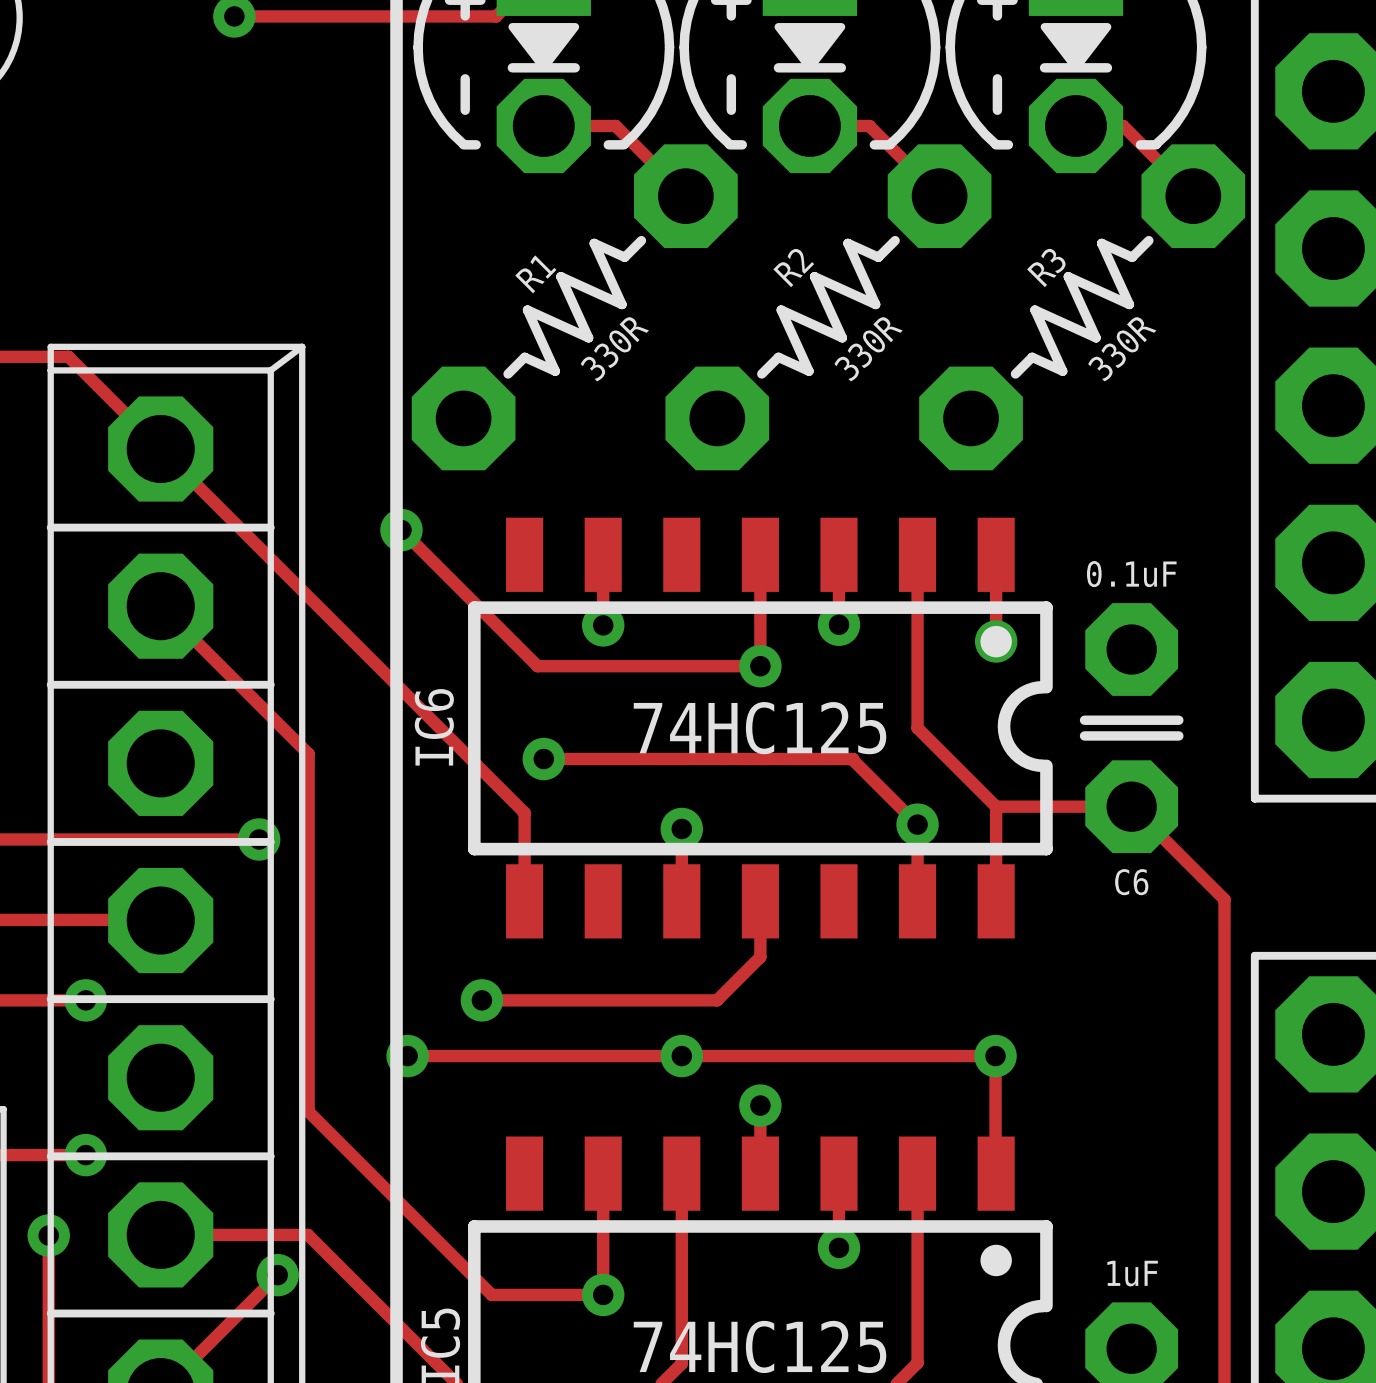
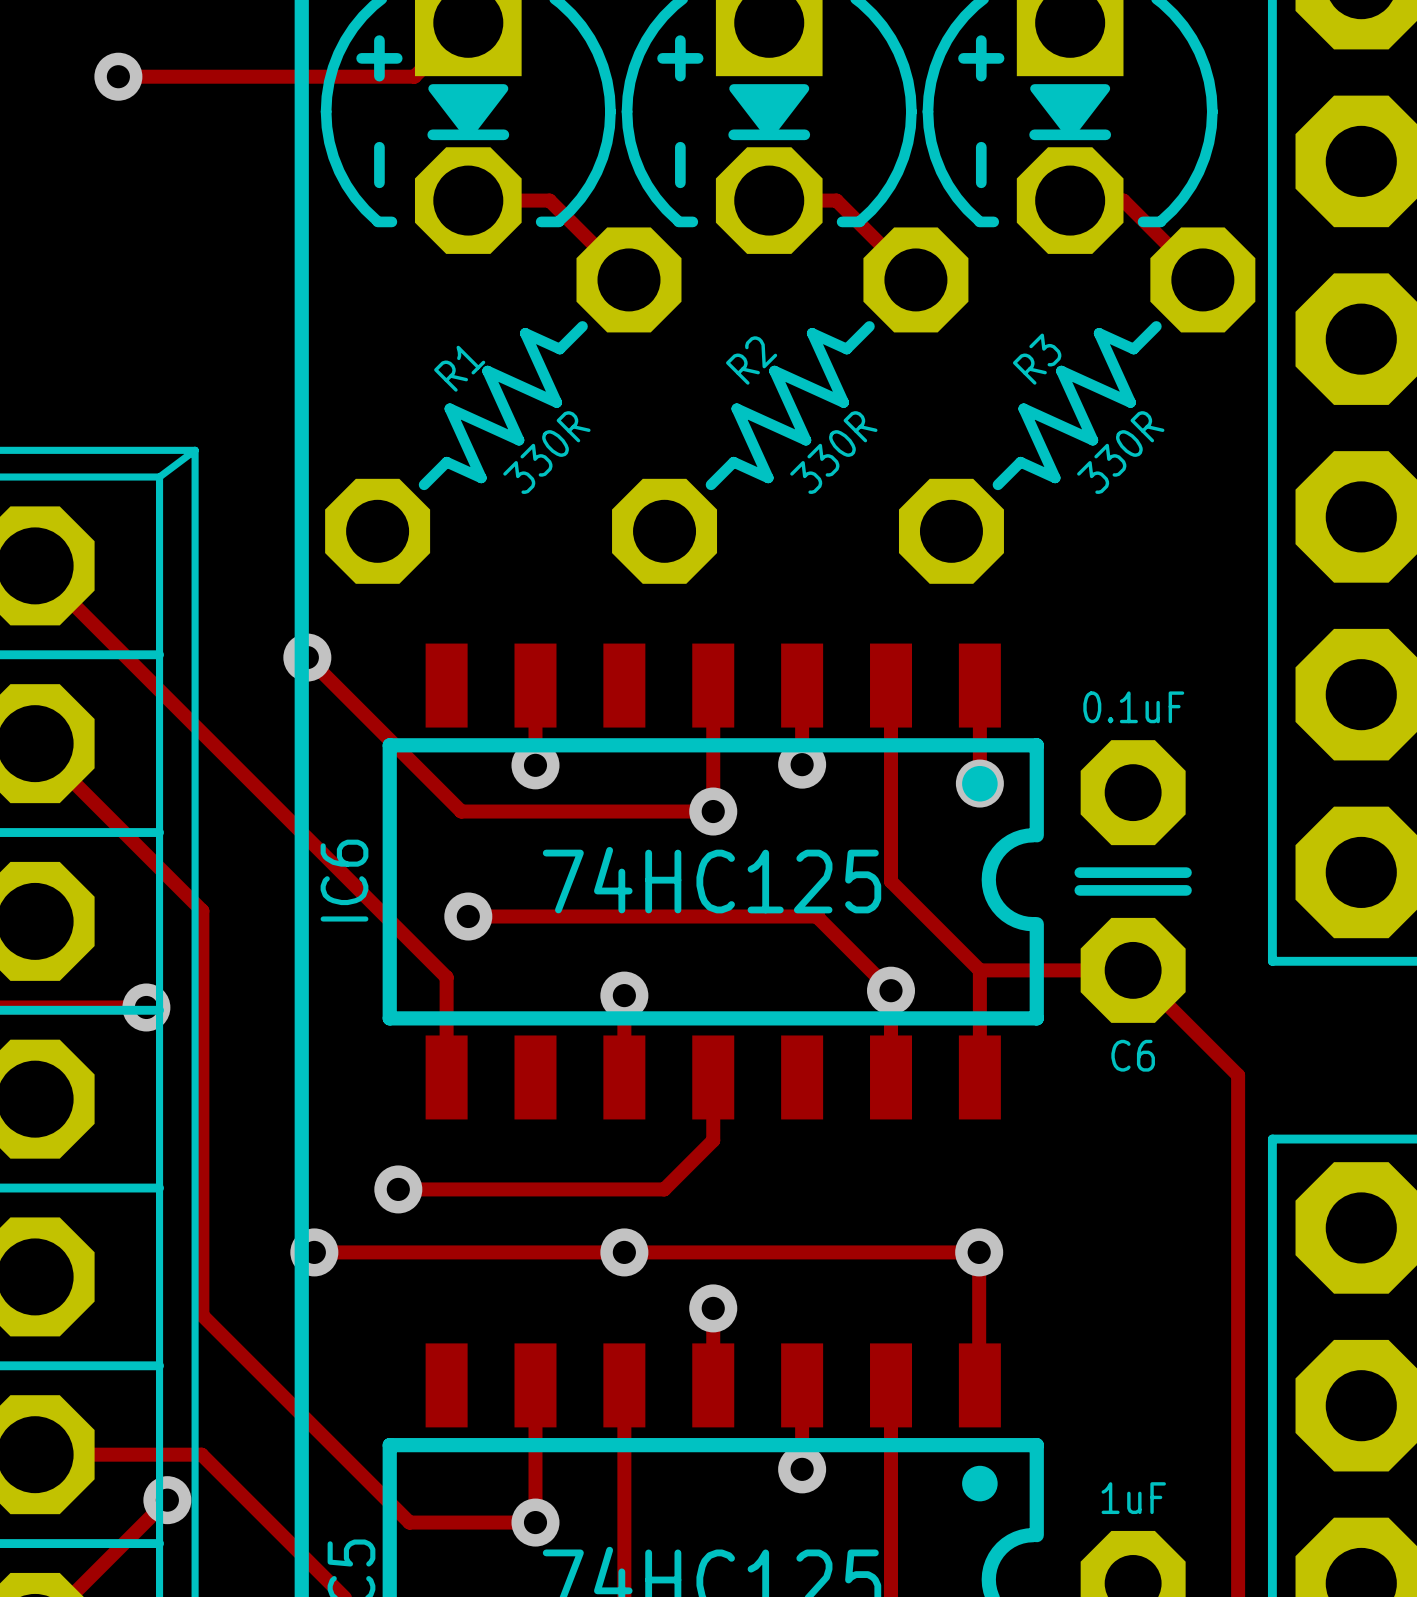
R1 footprint: [411, 144, 738, 471] -> [325, 227, 682, 584]
R2 footprint: [665, 144, 992, 471] -> [612, 227, 969, 584]
R3 footprint: [919, 144, 1246, 471] -> [898, 227, 1256, 584]

